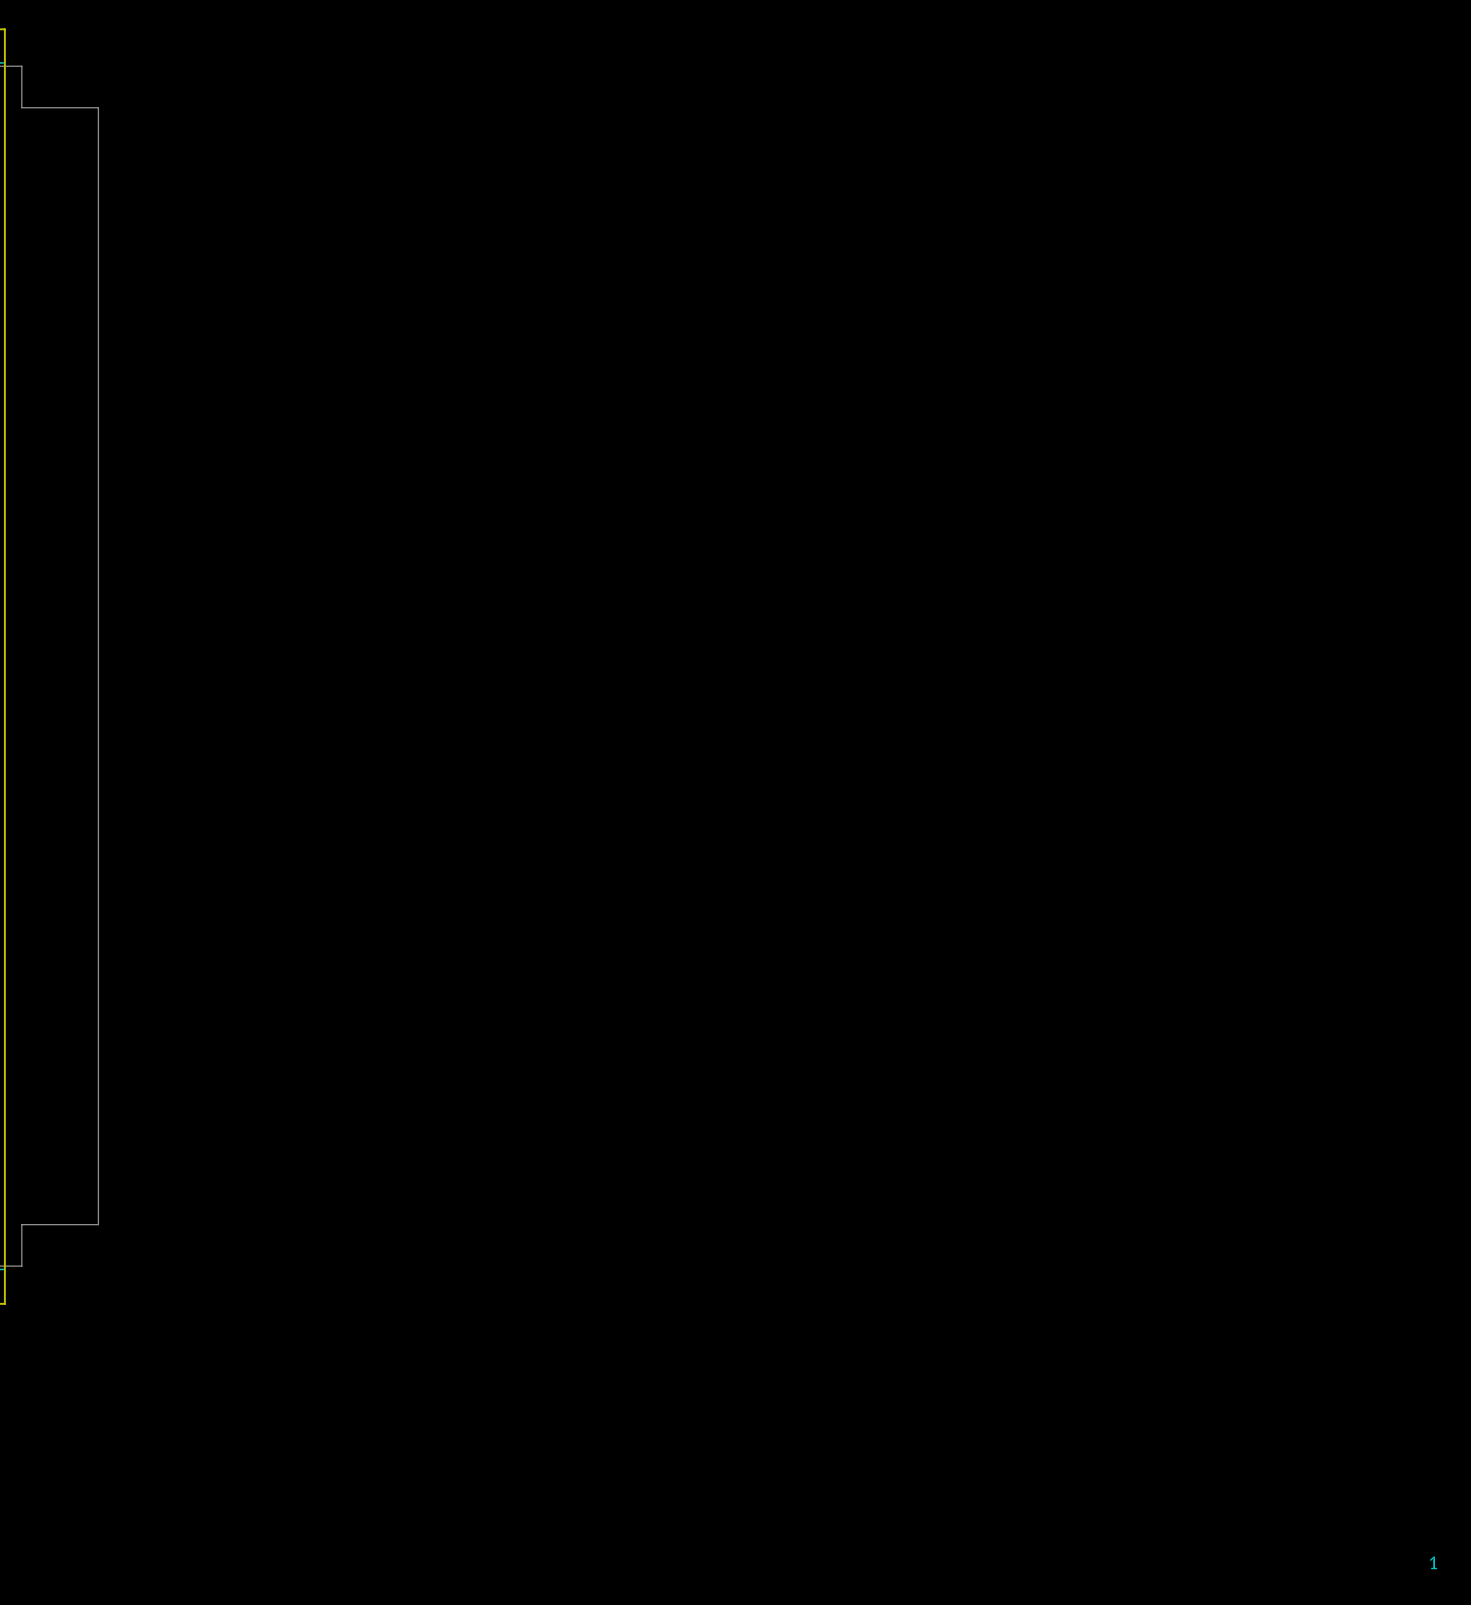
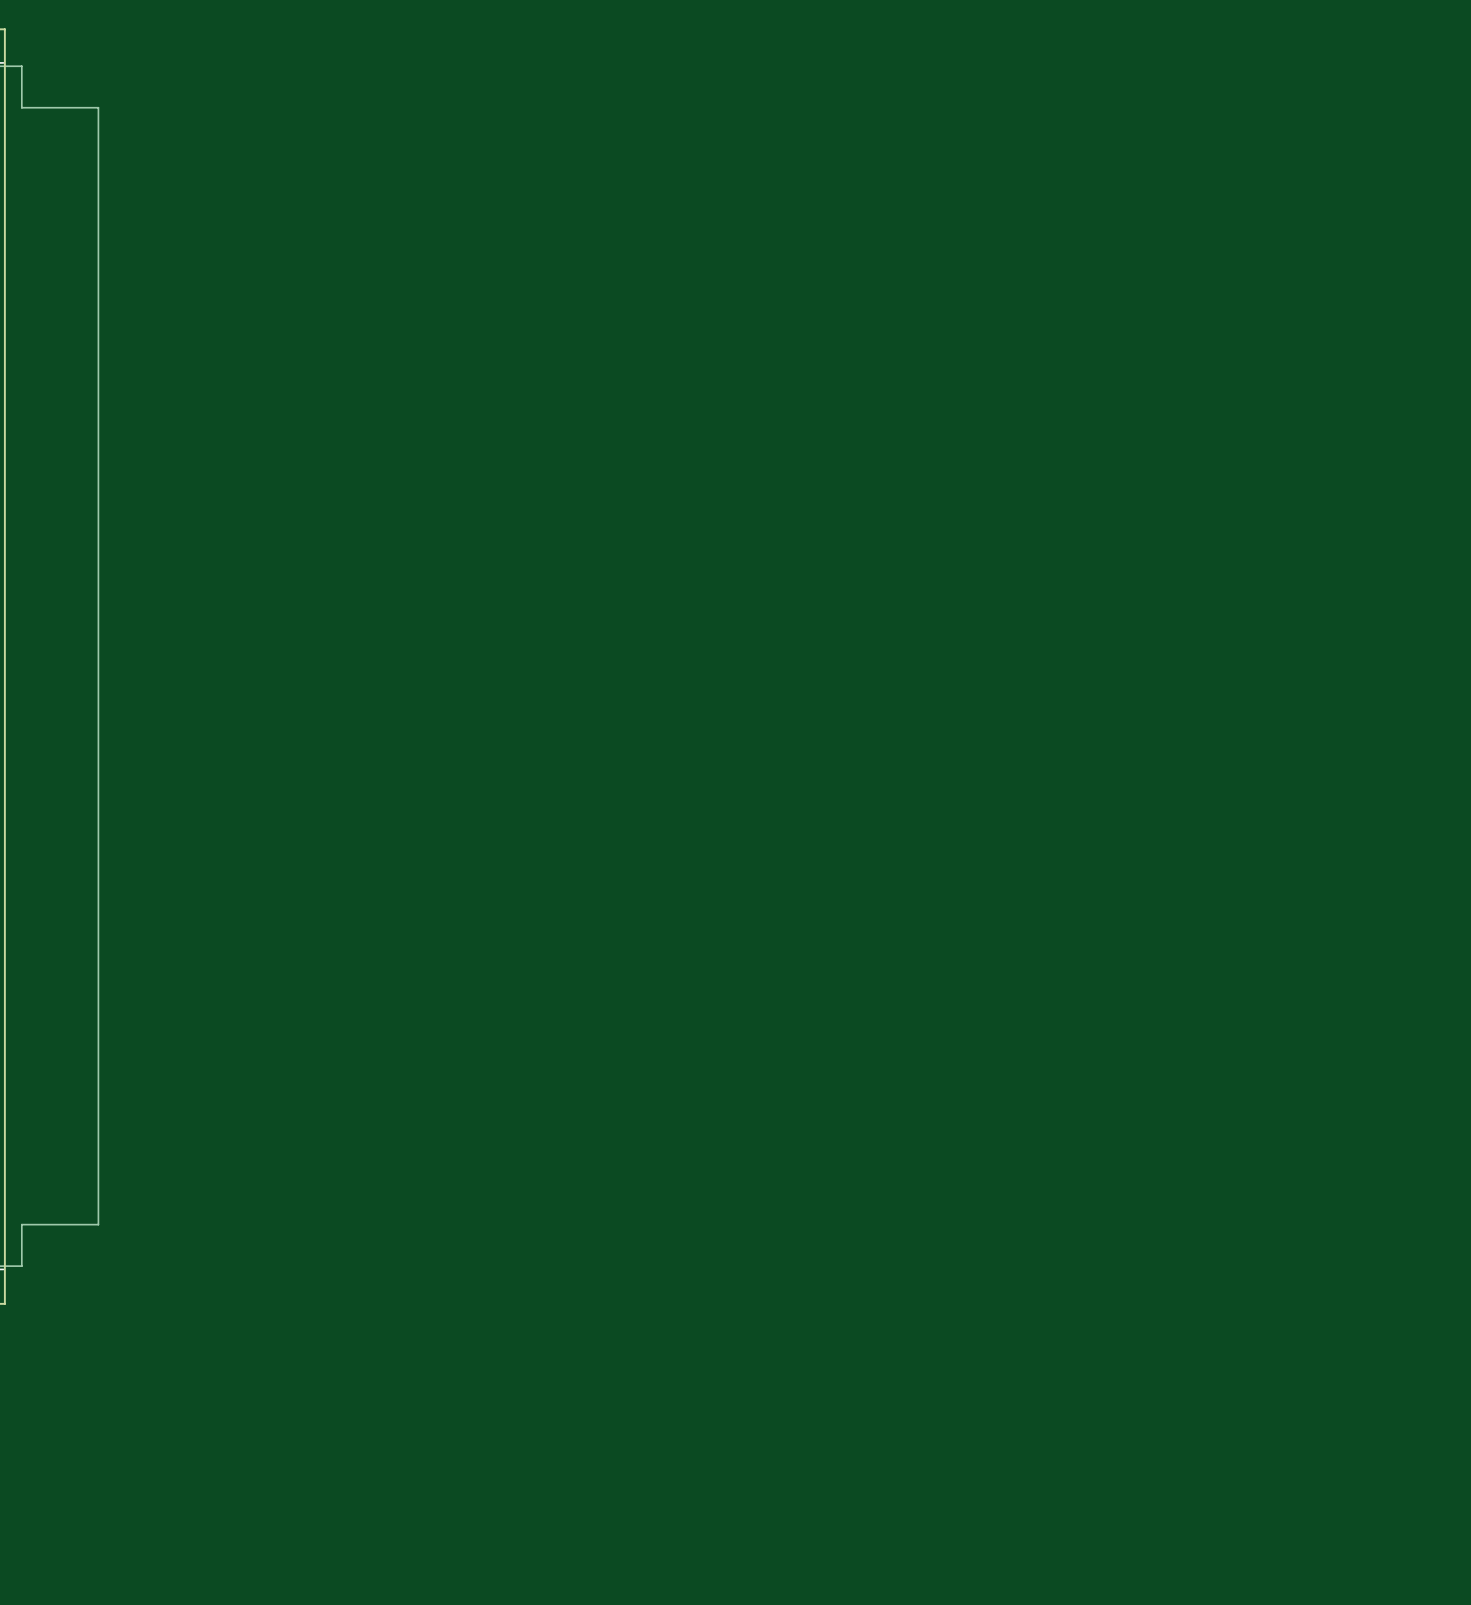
text: 1 (1433, 1562) -> none

